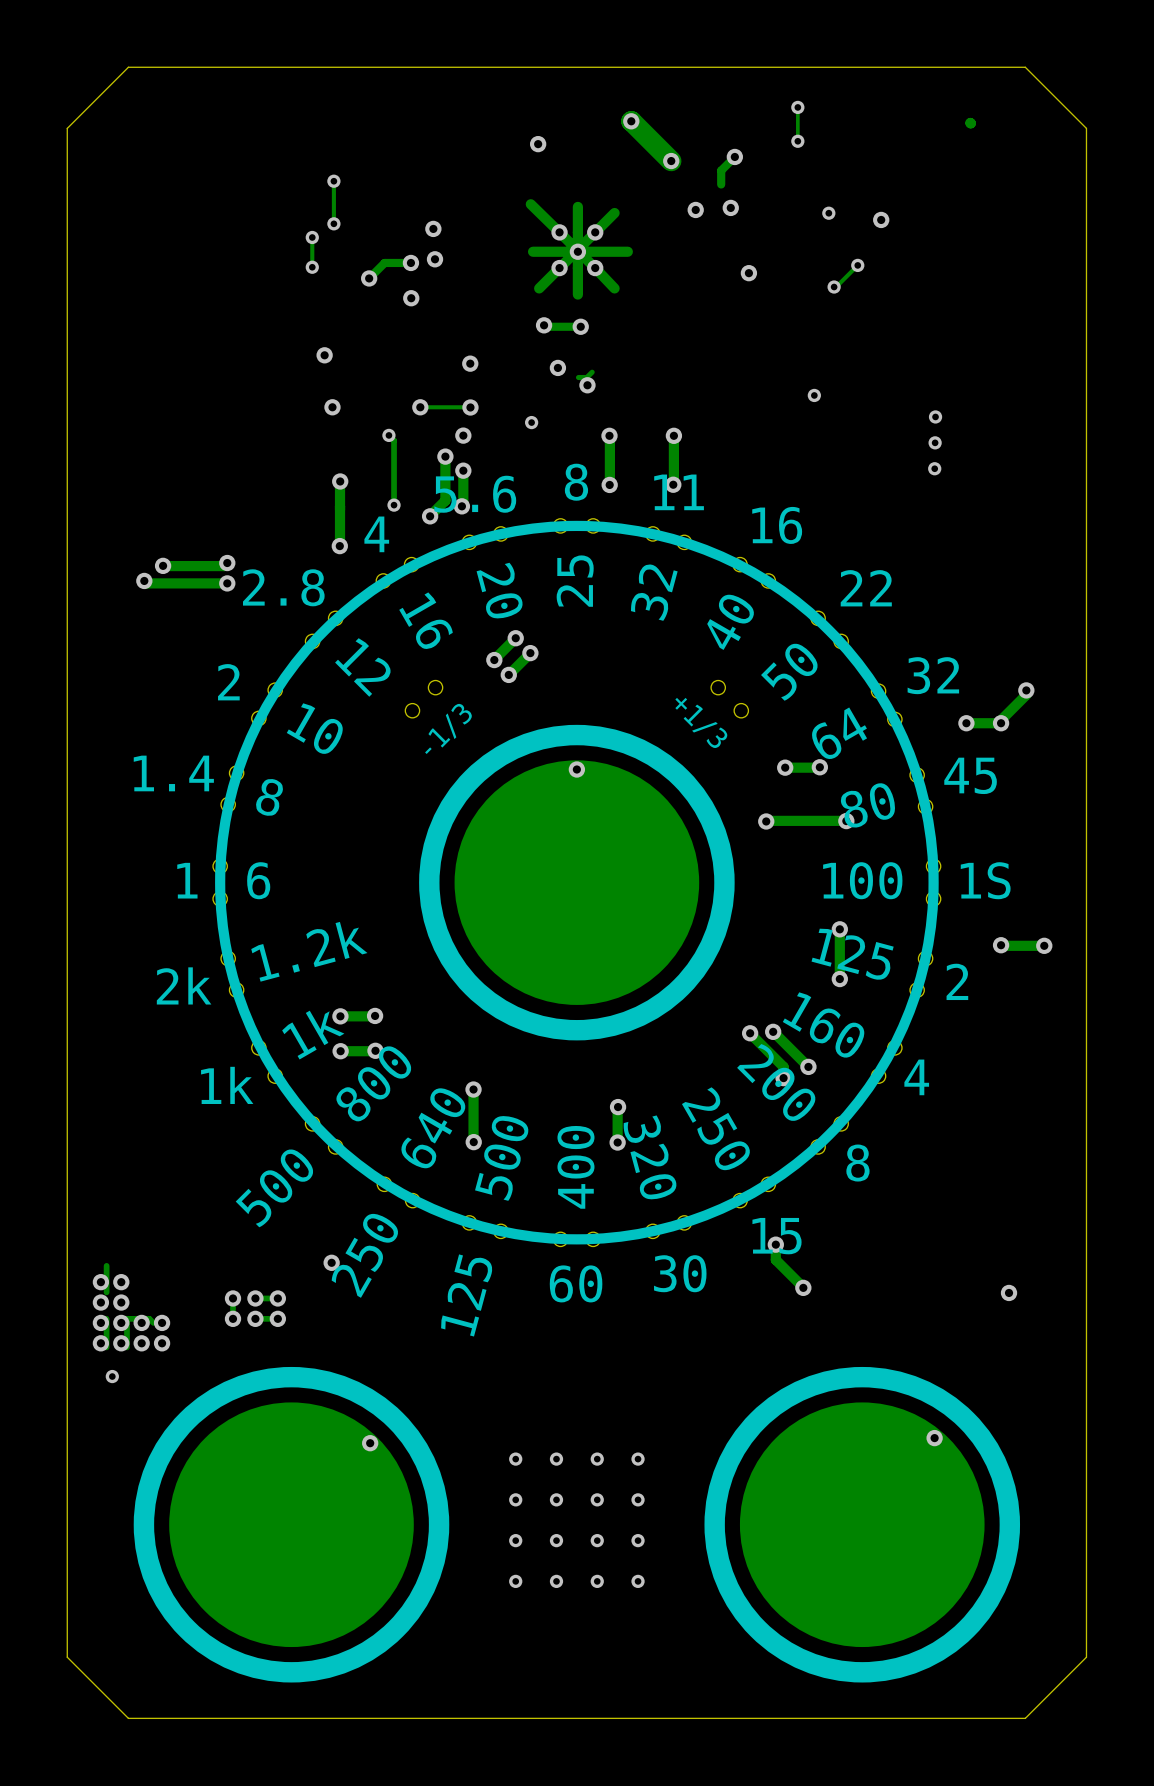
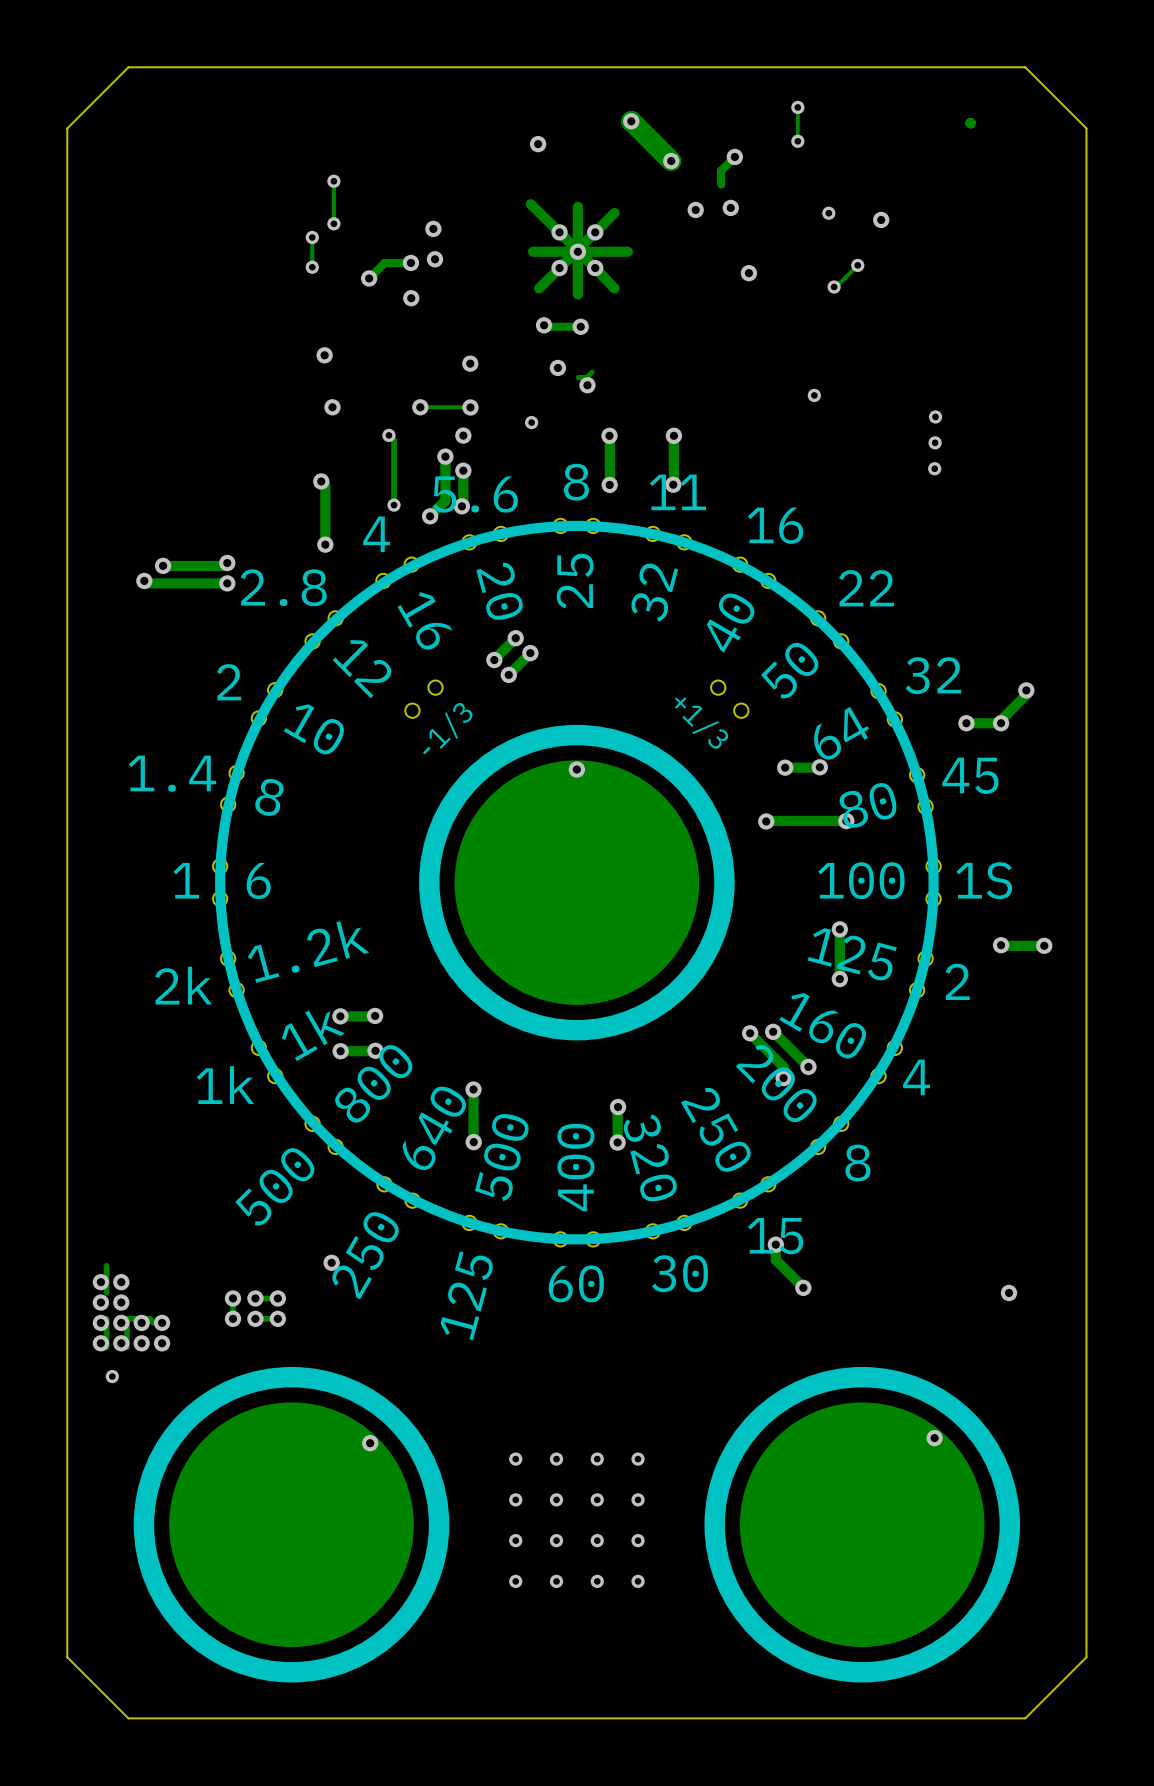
track: none -> (321, 481) (325, 485) (325, 544)
track: (340, 481) (340, 545) -> none
via position: (340, 481) -> (321, 481)
via position: (339, 546) -> (325, 544)

